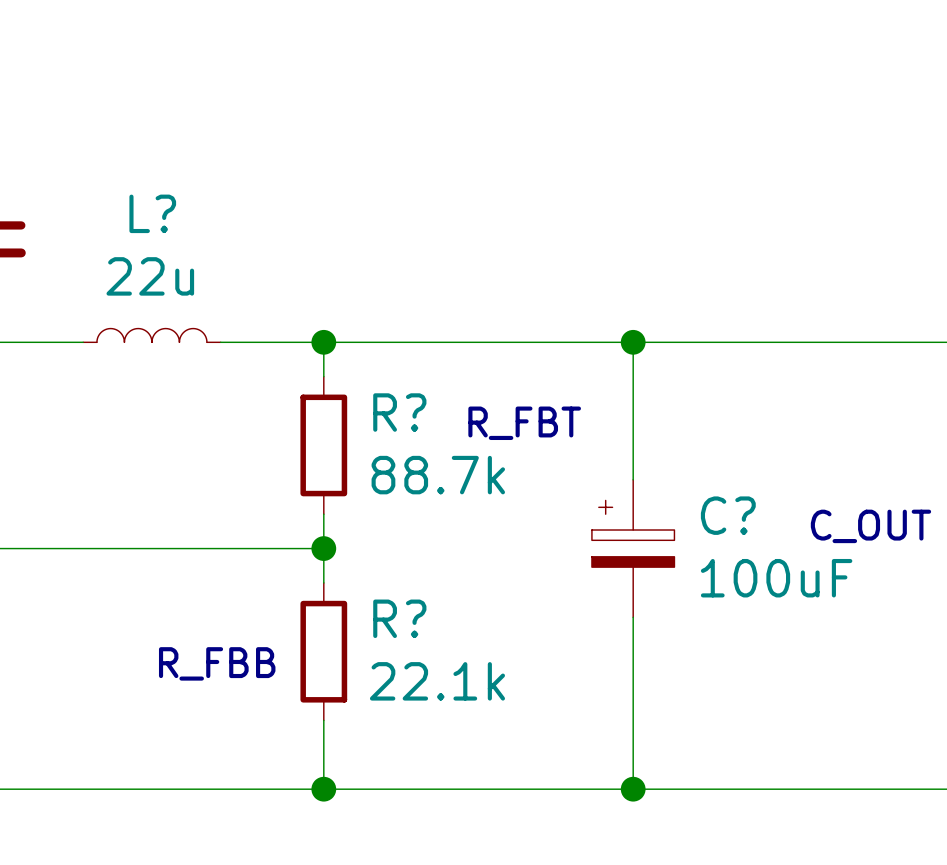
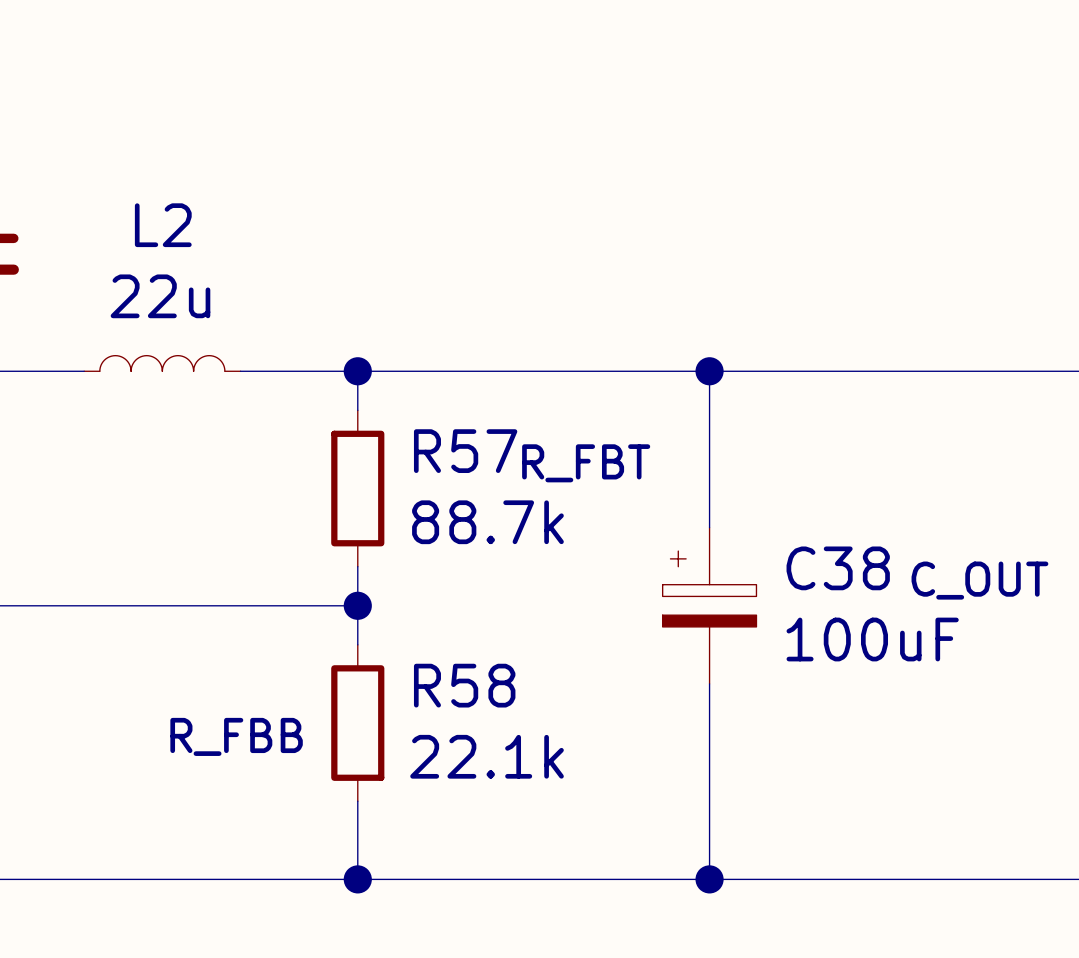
L? name: L? (152, 213) -> L2 (163, 225)
R? name: R? (399, 412) -> R57 (465, 451)
C? name: C? (728, 515) -> C38 (838, 568)
R? name: R? (399, 618) -> R58 (464, 685)

